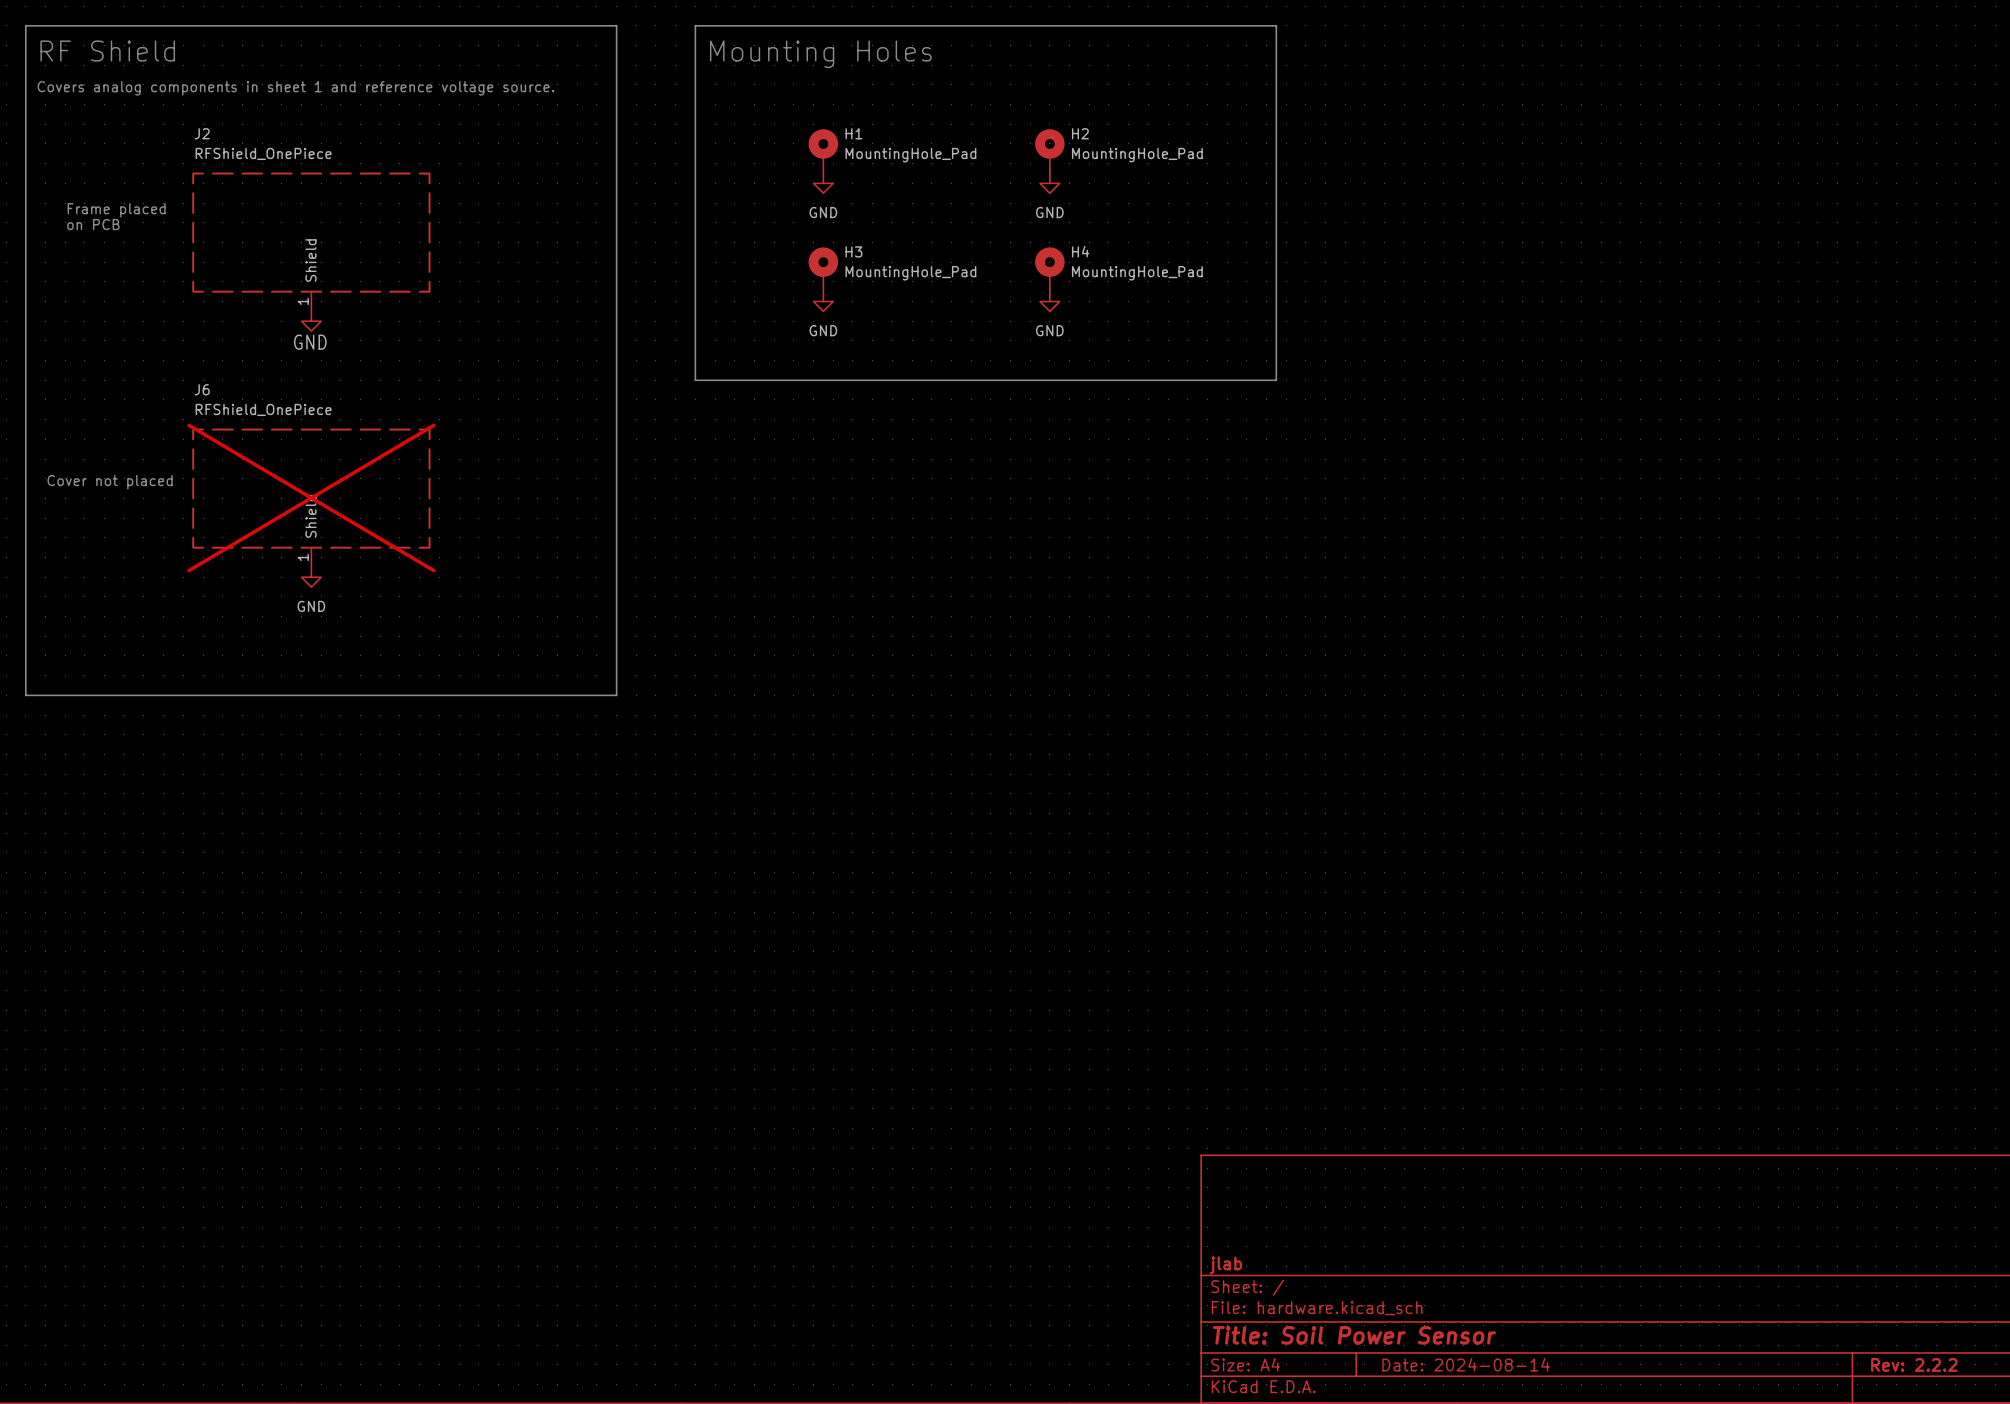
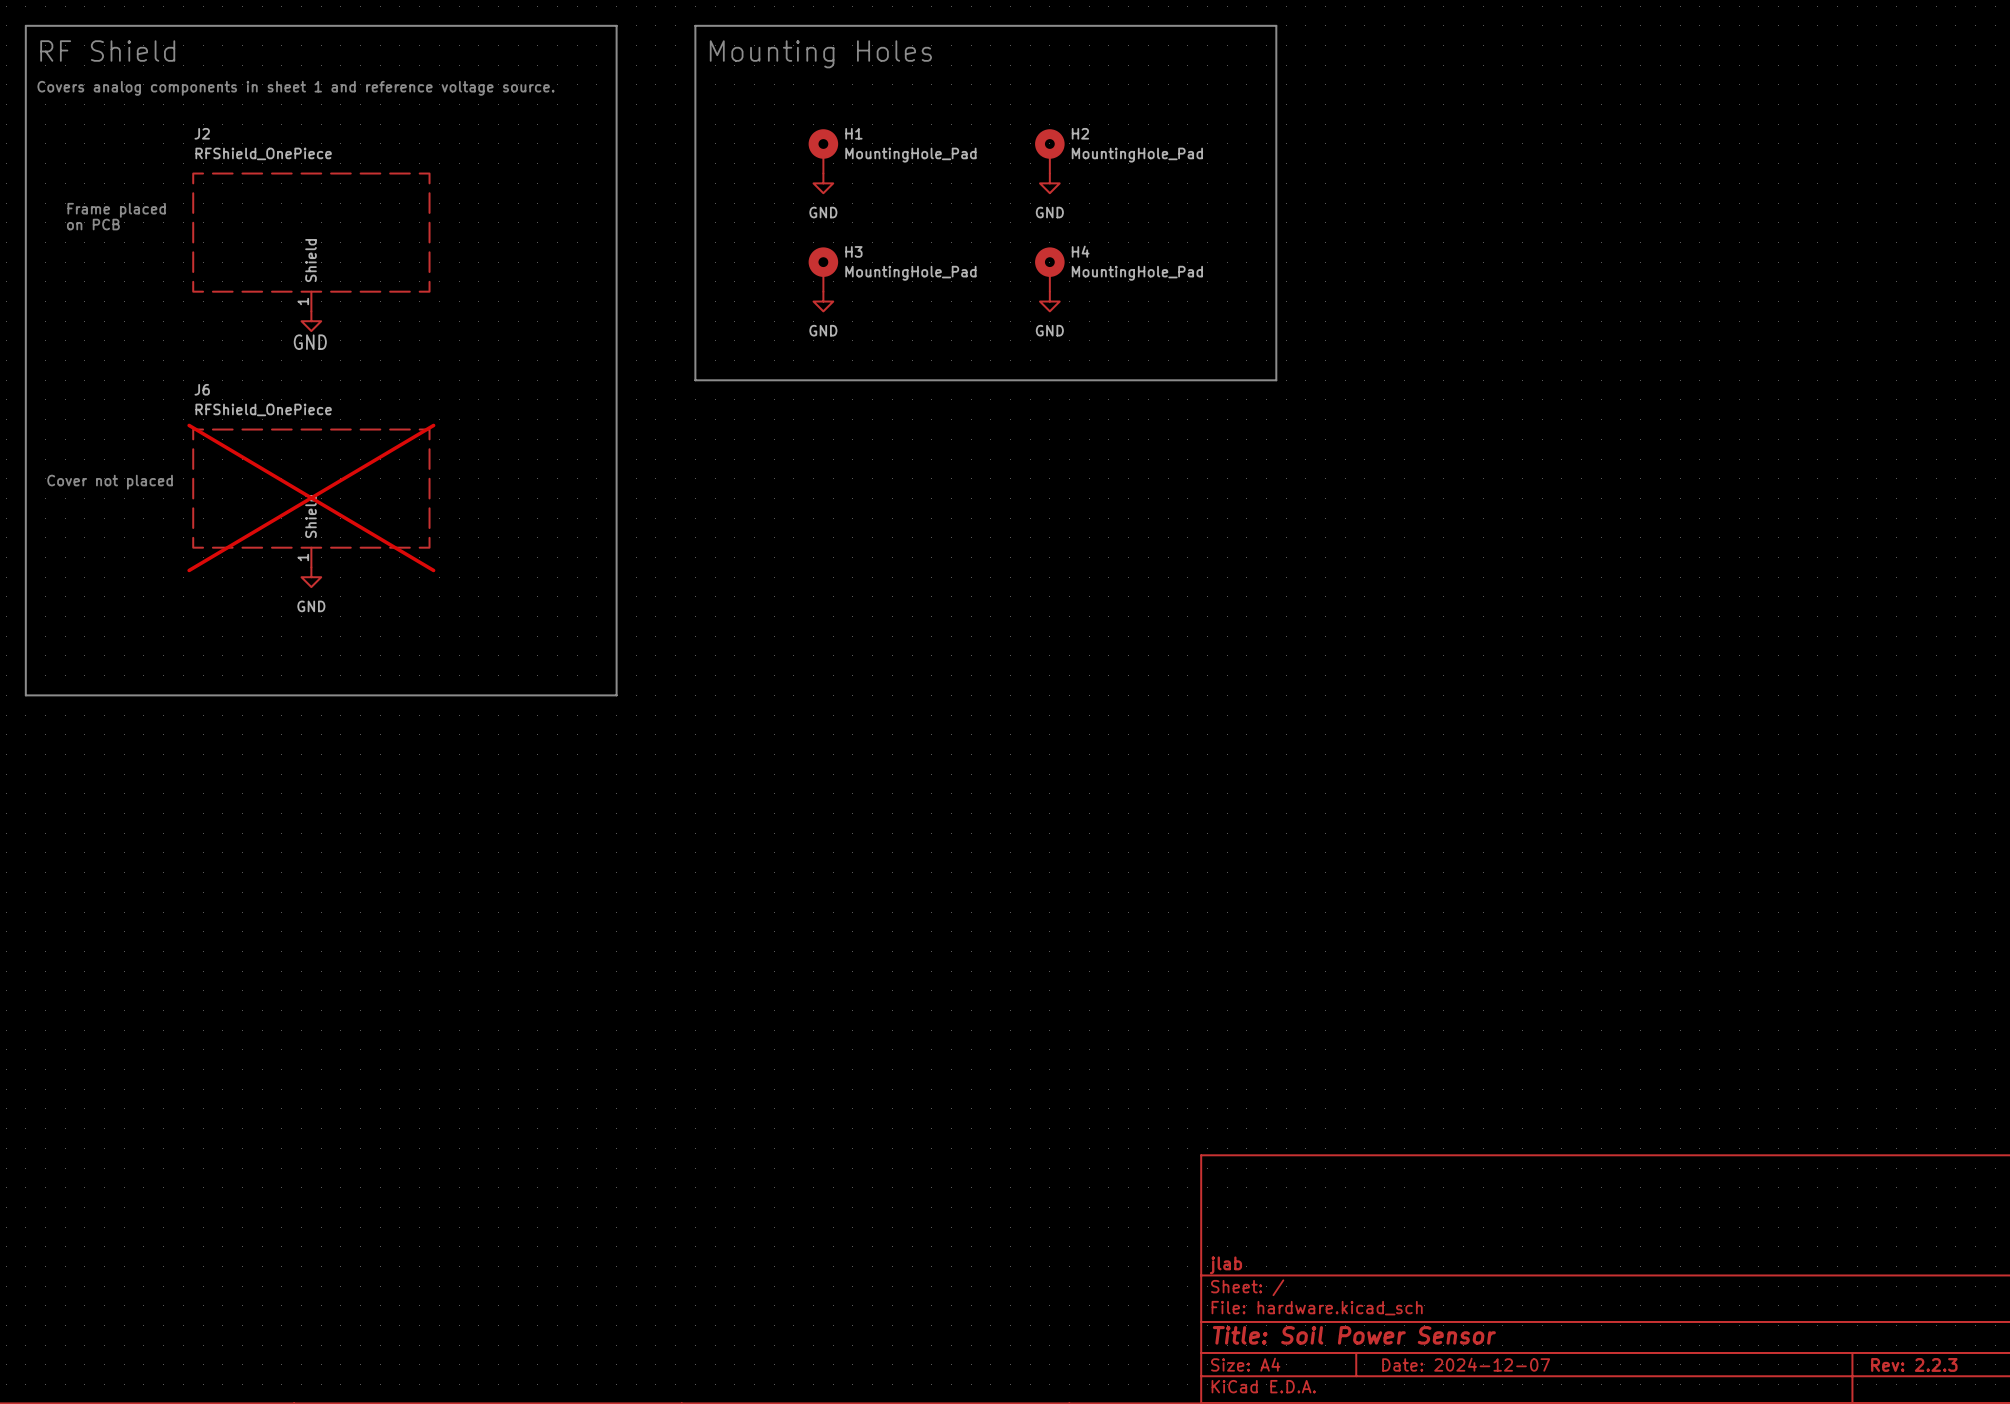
title block: Date: 2024-08-14 (1466, 1364) -> Date: 2024-12-07 (1466, 1364)
title block: Rev: 2.2.2 (1914, 1364) -> Rev: 2.2.3 (1914, 1364)

